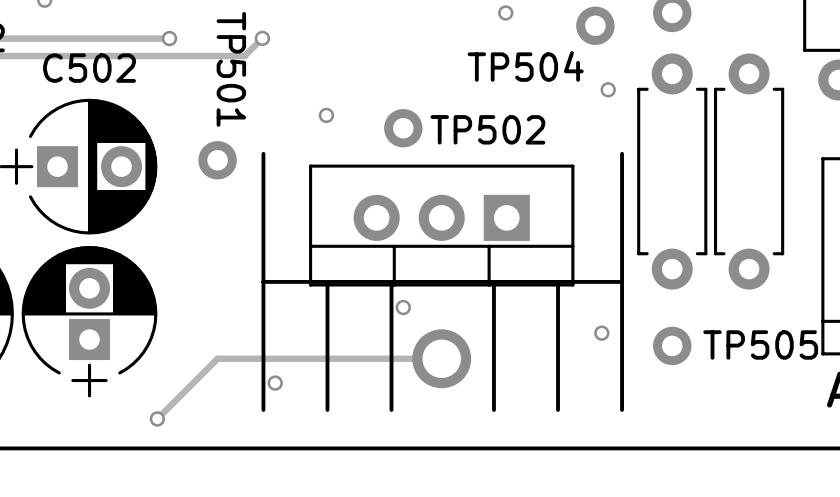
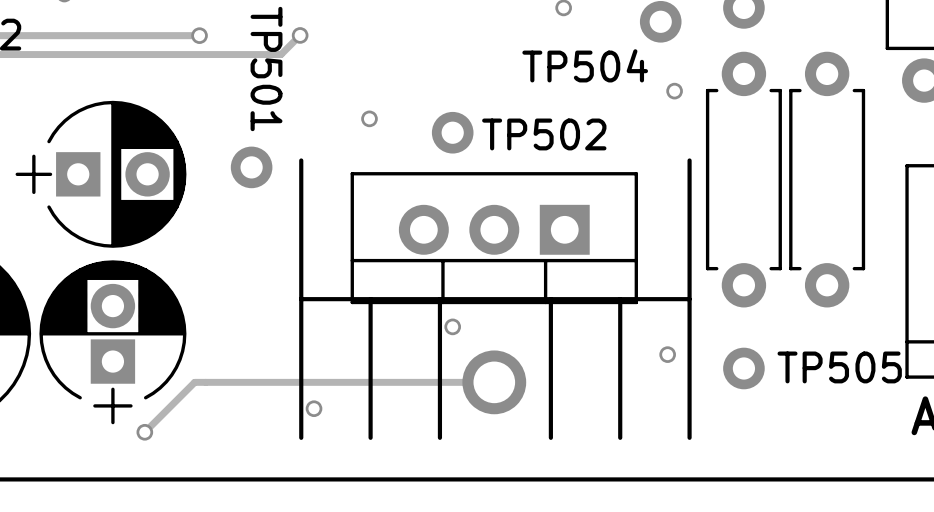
C502 name: C502 (89, 68) -> none
track: (217, 358) (157, 418) -> (251, 382) (194, 382) (144, 432)
via position: (157, 418) -> (144, 432)

